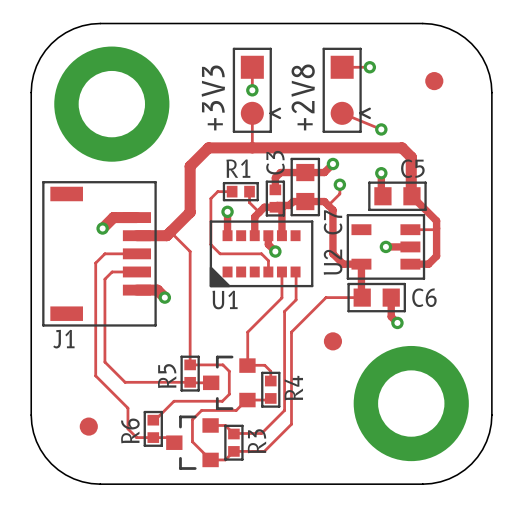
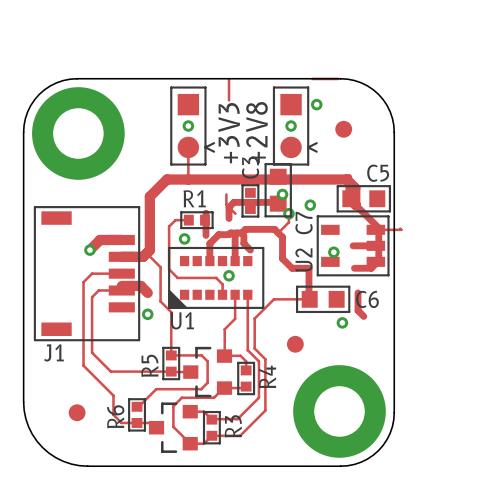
via: (369, 67) -> none
part position: (434, 81) -> (343, 129)
via: (252, 90) -> none
part: (256, 90) -> none
part: (346, 90) -> none
via: none -> (316, 104)
text position: +3V3 (213, 97) -> +3V3 (229, 133)
text position: +2V8 (303, 97) -> +2V8 (256, 132)
via: (111, 104) -> none
track: (252, 113) (252, 147) -> (188, 147) (188, 179)
track: (342, 113) (381, 129) -> none
via: none -> (188, 126)
part: none -> (192, 126)
via: none -> (291, 126)
part: none -> (295, 126)
board edge: (31, 124) (31, 83) (40, 58) (51, 43) (65, 32) (91, 24) (422, 23) (449, 28) (471, 43) (486, 66) (491, 92) (491, 415) (489, 432) (482, 449) (471, 463) (449, 478) (431, 483) (372, 484) -> (23, 132) (27, 111) (39, 94) (56, 82) (70, 79) (340, 78) (361, 82) (378, 94) (390, 111) (394, 132) (393, 419) (390, 433) (378, 450) (361, 462) (340, 466)
via: none -> (78, 133)
via: (381, 129) -> none
track: (332, 164) (324, 172) (280, 172) (275, 177) (275, 189) -> (282, 194) (274, 202) (233, 202) (229, 207) (229, 218)
via: (332, 164) -> none
via: (381, 173) -> none
track: (339, 184) (339, 193) (328, 205) -> (288, 213) (288, 222) (278, 233)
via: (339, 184) -> none
track: (232, 191) (217, 191) (210, 198) (210, 244) (220, 253) (261, 253) (268, 260) (268, 271) -> (188, 220) (175, 220) (169, 226) (169, 269) (177, 277) (216, 277) (222, 284) (222, 294)
R1 position: (240, 191) -> (196, 220)
via: none -> (282, 194)
via: none -> (310, 205)
track: (284, 205) (281, 208) (281, 235) -> (237, 233) (235, 235) (235, 261)
via: (227, 211) -> none
via: none -> (288, 213)
track: (136, 217) (113, 217) (102, 228) -> (121, 239) (100, 239) (89, 250)
via position: (102, 228) -> (89, 250)
track: (170, 231) (190, 251) (190, 318) -> (146, 253) (160, 267) (160, 301) (171, 312)
track: (136, 235) (166, 235) (190, 212) (190, 166) (208, 147) (402, 147) (411, 157) (411, 195) (436, 220) (436, 256) (428, 264) (410, 264) -> none
track: (254, 235) (254, 216) (264, 207) (289, 205) (293, 201) (324, 201) (332, 210) (332, 253) (343, 264) (361, 264) (362, 297) (326, 297) (291, 332) (291, 369) -> (209, 261) (209, 243) (218, 234) (241, 233) (245, 229) (274, 229) (282, 237) (282, 258) (292, 268) (308, 268) (309, 299) (273, 299) (254, 318) (254, 348) (265, 359)
via: none -> (184, 238)
via position: (385, 246) -> (333, 252)
via: (275, 251) -> none
J1 position: (99, 253) -> (87, 273)
track: (136, 253) (104, 253) (95, 263) (95, 286) -> (121, 273) (92, 273) (83, 282)
U1 position: (261, 253) -> (216, 277)
track: none -> (121, 256) (143, 256) (149, 250) (149, 196) (166, 179) (346, 179) (355, 188) (355, 204) (378, 228) (378, 260) (371, 268) (354, 268)
track: (136, 271) (112, 271) (104, 279) (104, 302) -> (121, 290) (98, 290) (92, 297)
track: (281, 271) (281, 297) (247, 332) (247, 336) -> (235, 294) (235, 318) (224, 329)
track: (295, 271) (296, 299) (284, 311) (284, 371) -> (247, 294) (247, 350) (258, 361)
via: none -> (229, 275)
via position: (164, 297) -> (147, 314)
C6 position: (376, 297) -> (323, 299)
via position: (397, 322) -> (342, 322)
part position: (332, 341) -> (295, 344)
via: (411, 403) -> none
via: none -> (339, 411)

